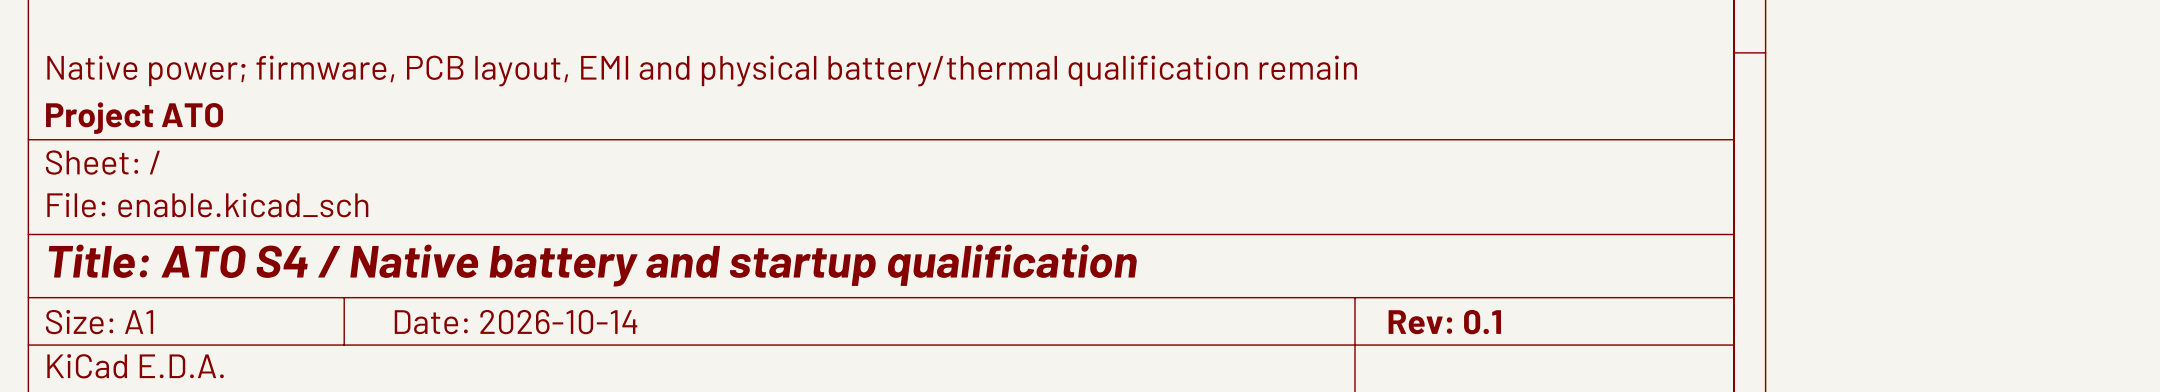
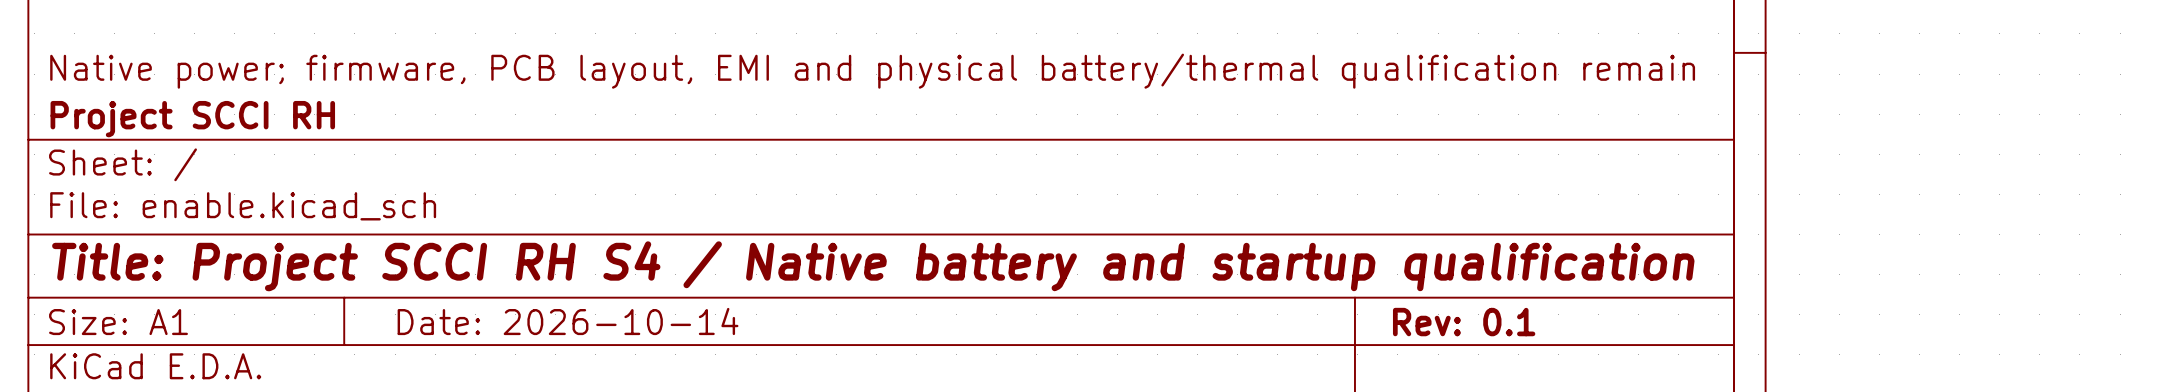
title block: Project ATO (134, 118) -> Project SCCI RH (192, 119)
title block: Title: ATO S4 / Native battery and startup qualification (592, 265) -> Title: Project SCCI RH S4 / Native battery and startup qualification (873, 266)

